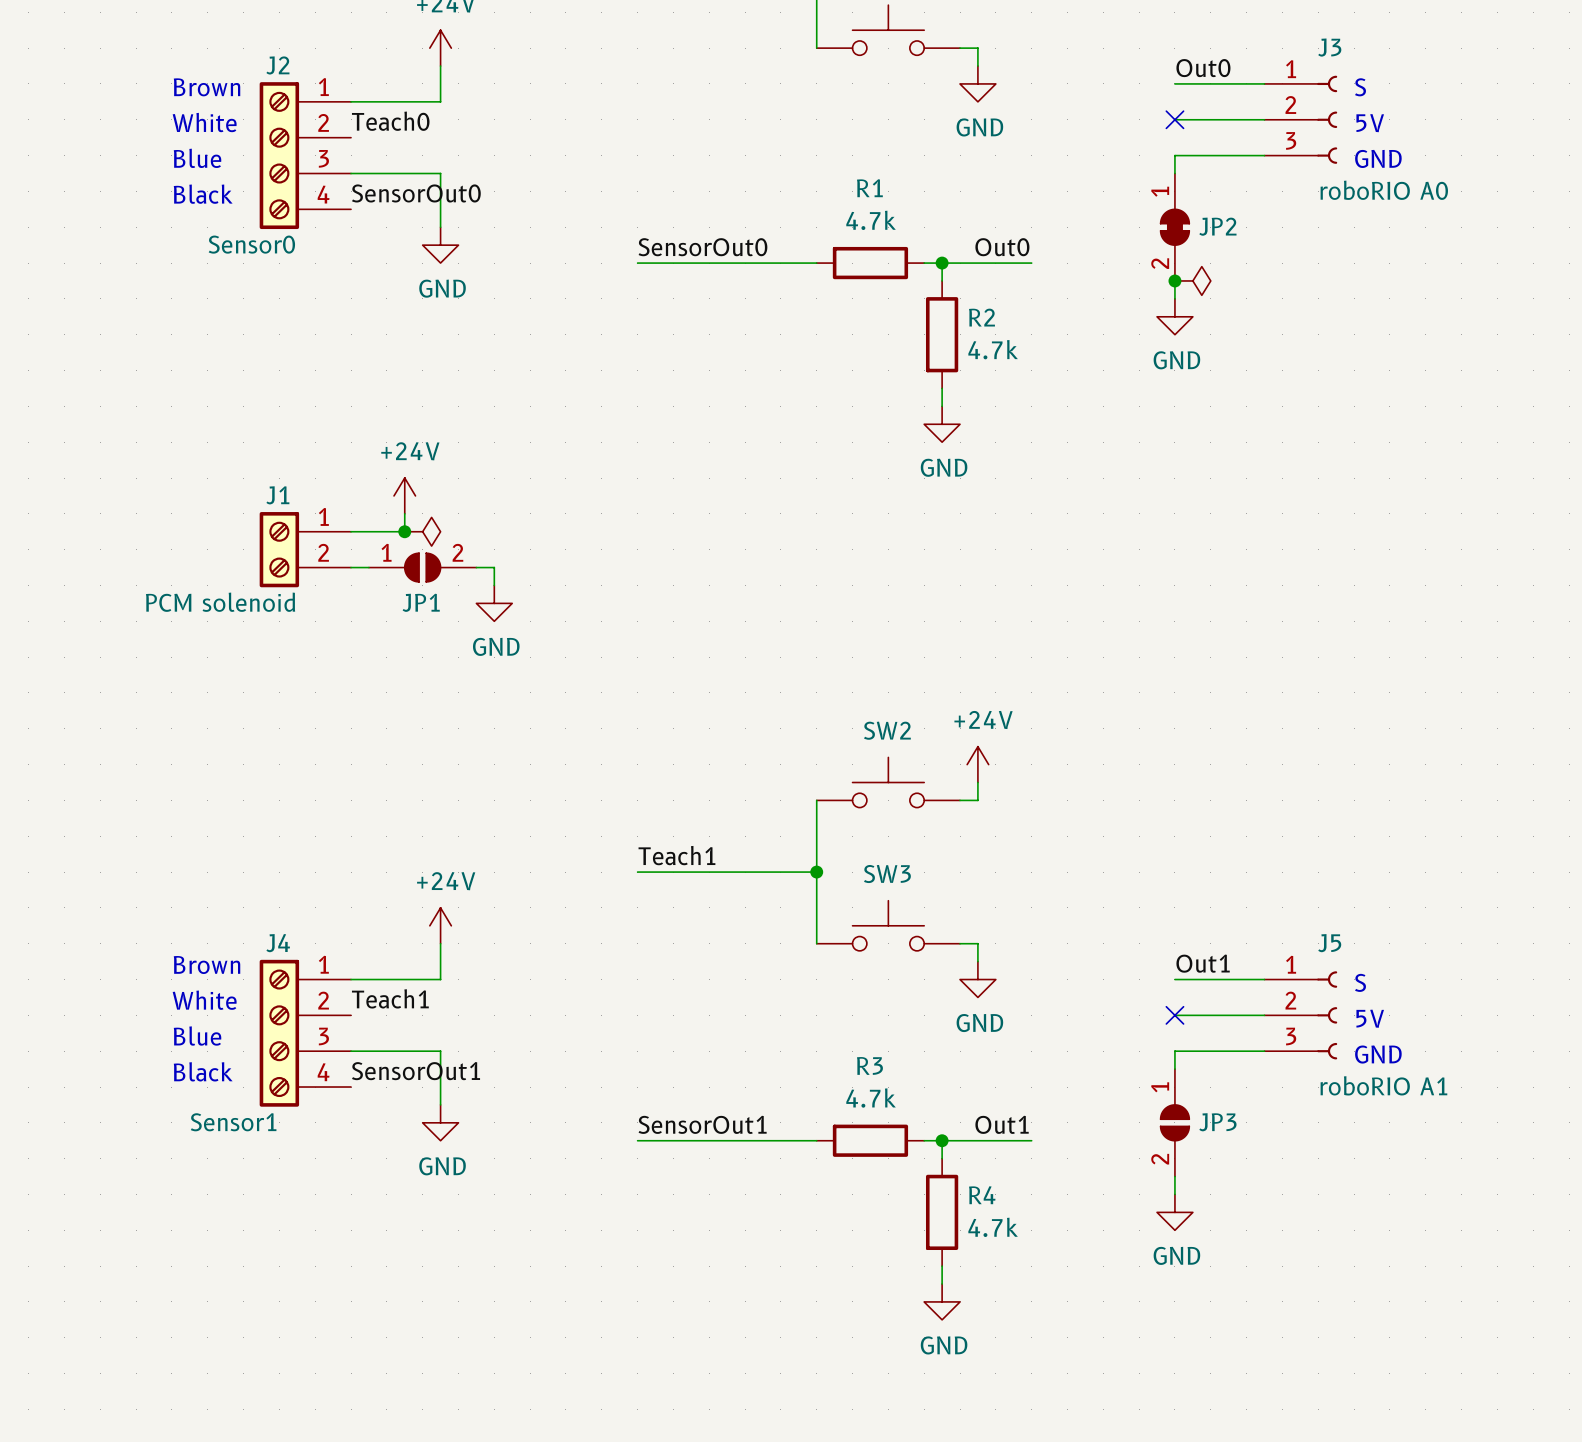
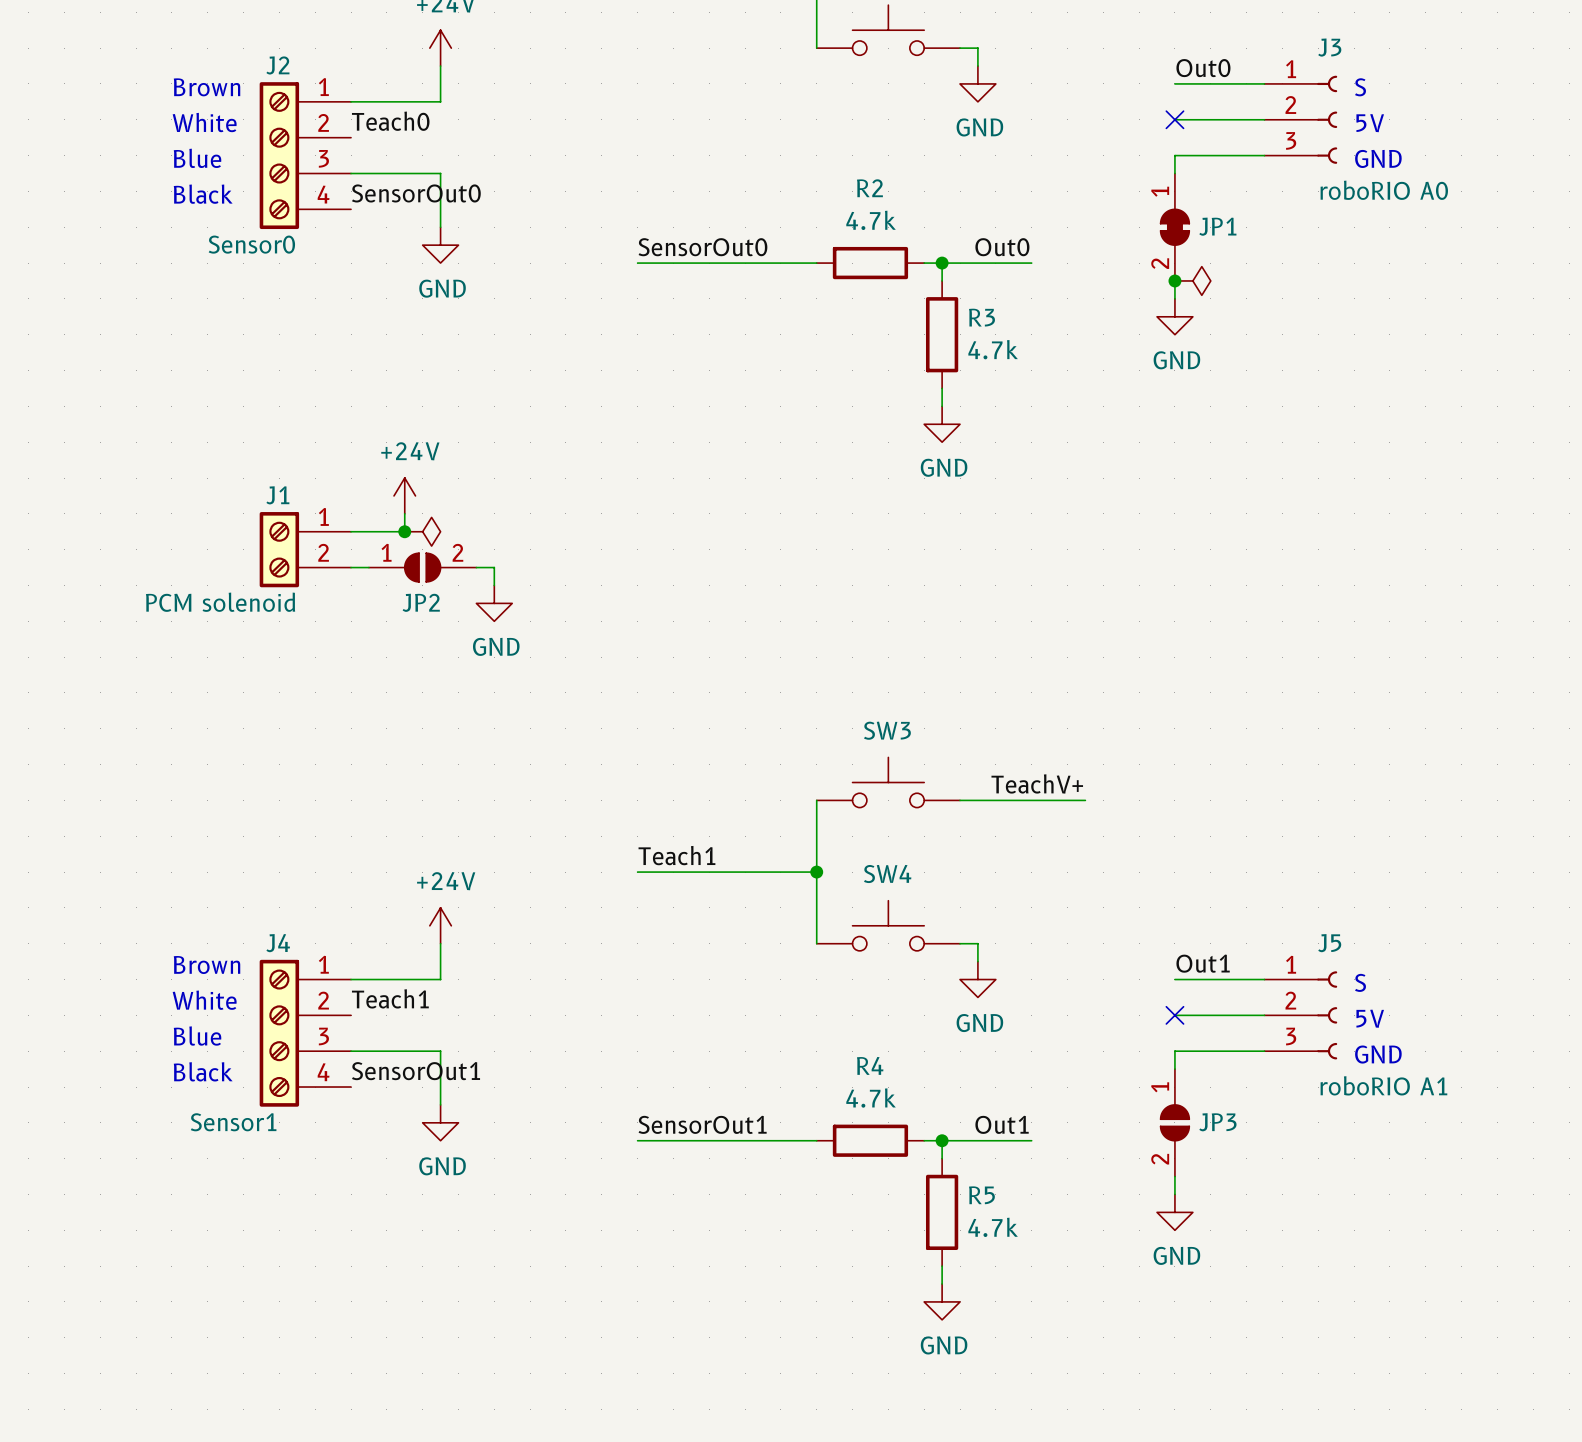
R1 name: R1 (869, 188) -> R2 (869, 188)
JP2 name: JP2 (1217, 226) -> JP1 (1217, 226)
R2 name: R2 (981, 317) -> R3 (981, 317)
JP1 name: JP1 (421, 602) -> JP2 (421, 602)
SW2 name: SW2 (887, 730) -> SW3 (887, 730)
power symbol: +24V (977, 764) -> none
wire: (977, 782) (977, 800) -> (1085, 800) (977, 800)
label: none -> TeachV+ (1037, 783)
SW3 name: SW3 (887, 874) -> SW4 (887, 874)
R3 name: R3 (869, 1065) -> R4 (870, 1065)
R4 name: R4 (982, 1195) -> R5 (981, 1195)

